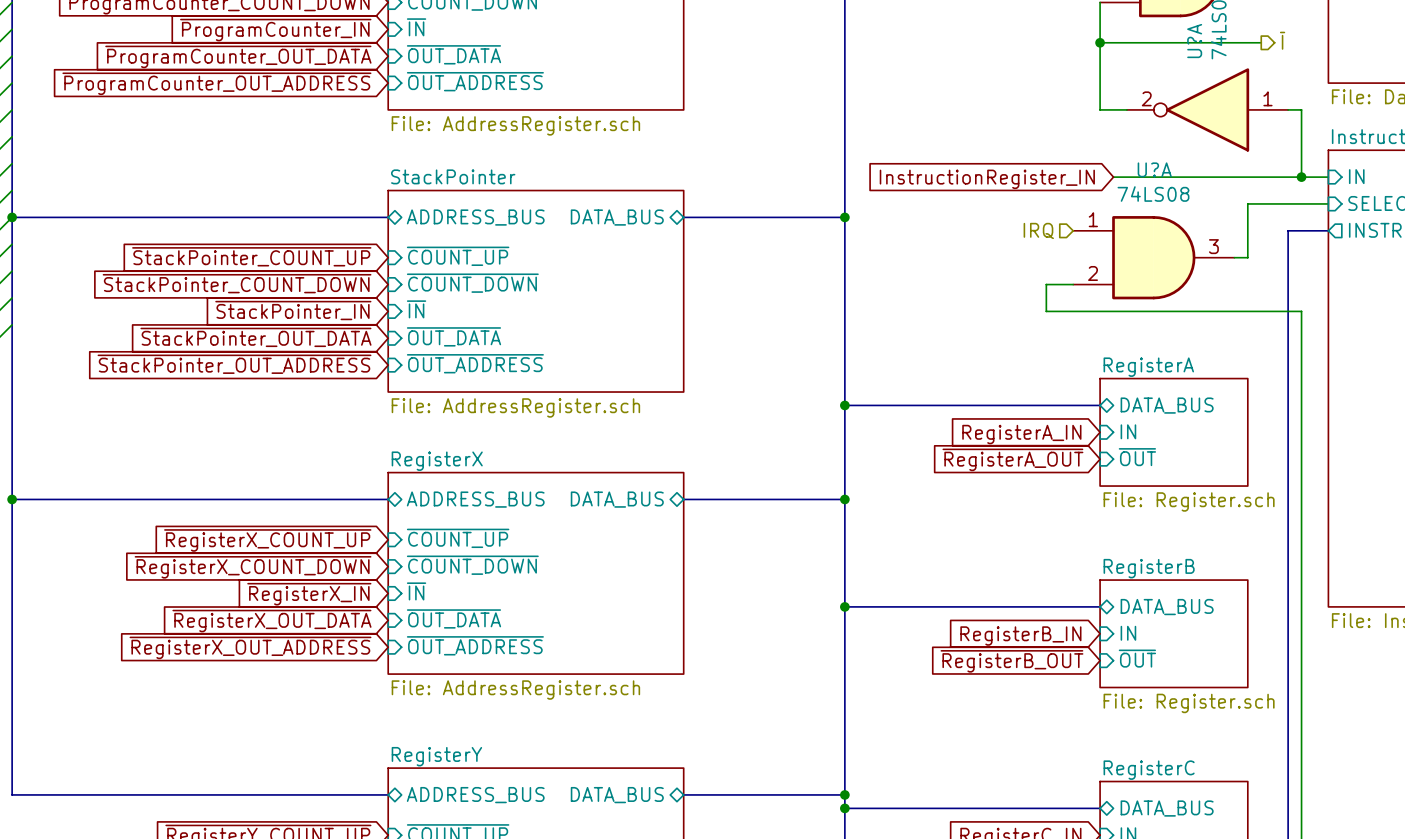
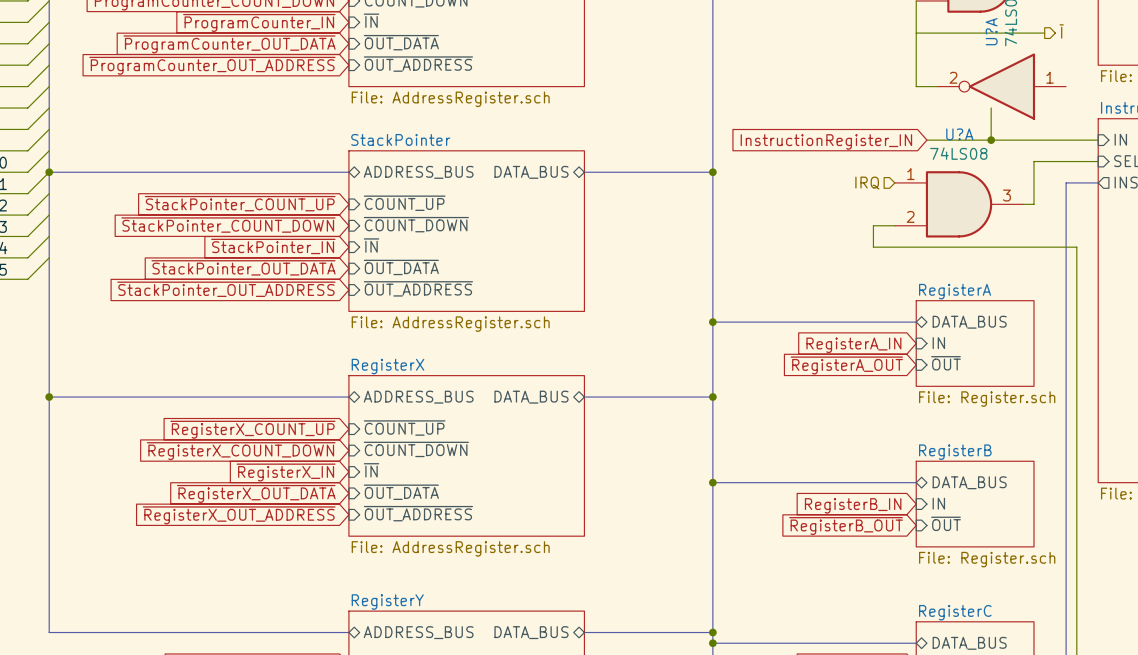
junction: (1100, 42) -> none
wire: (1288, 109) (1301, 109) (1301, 177) -> none
wire: none -> (991, 108) (991, 140)
junction: none -> (991, 140)
junction: (1301, 177) -> none

